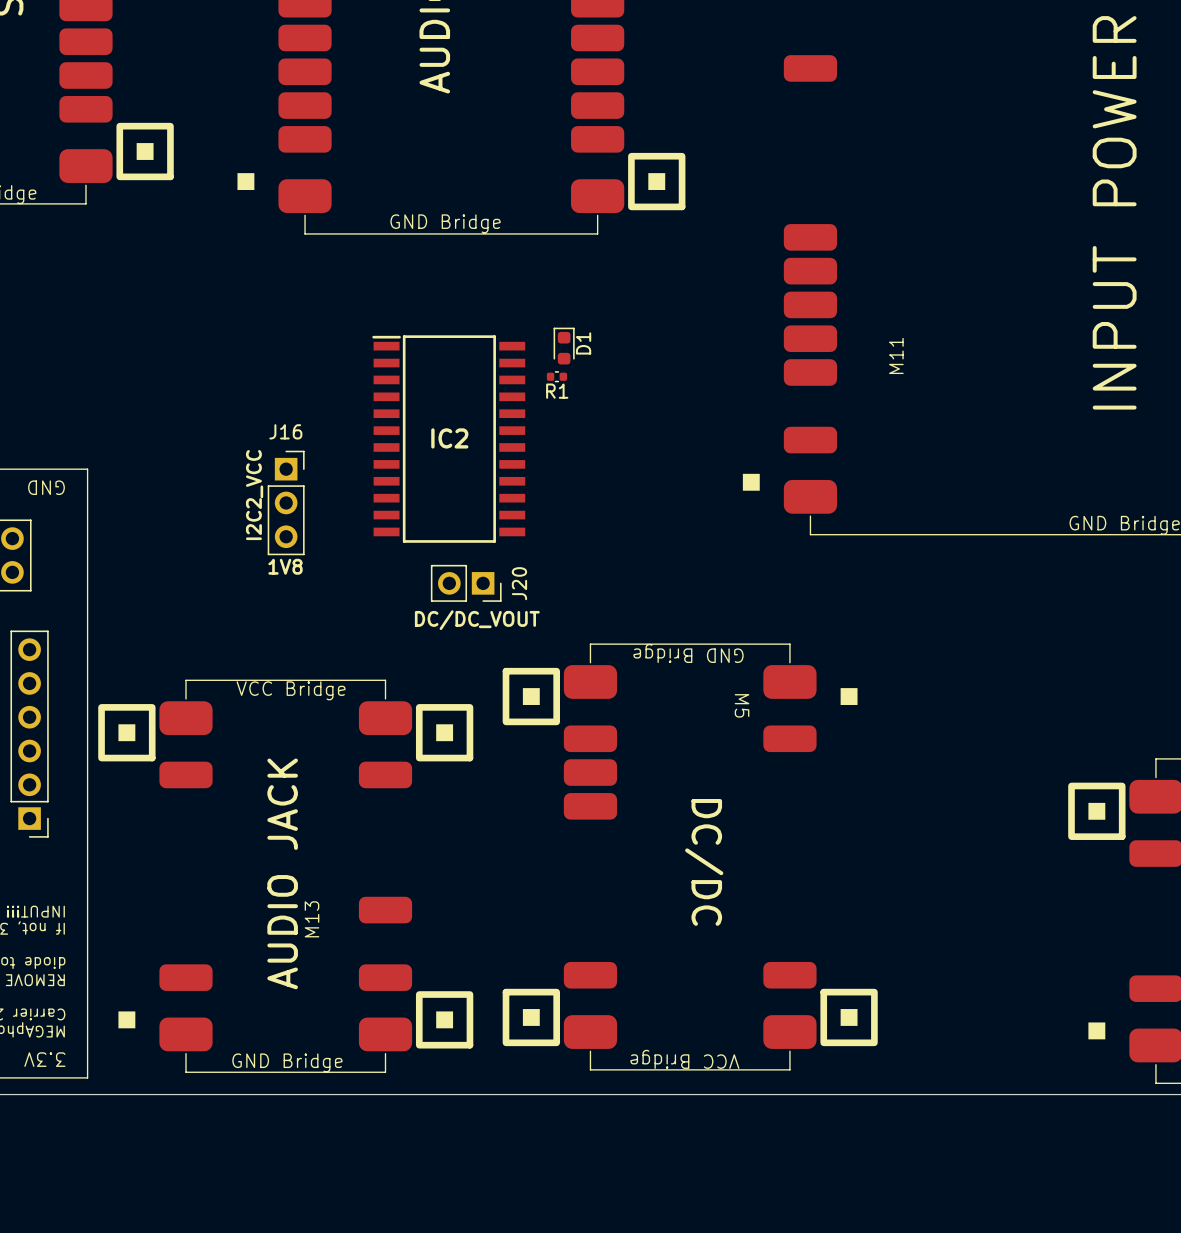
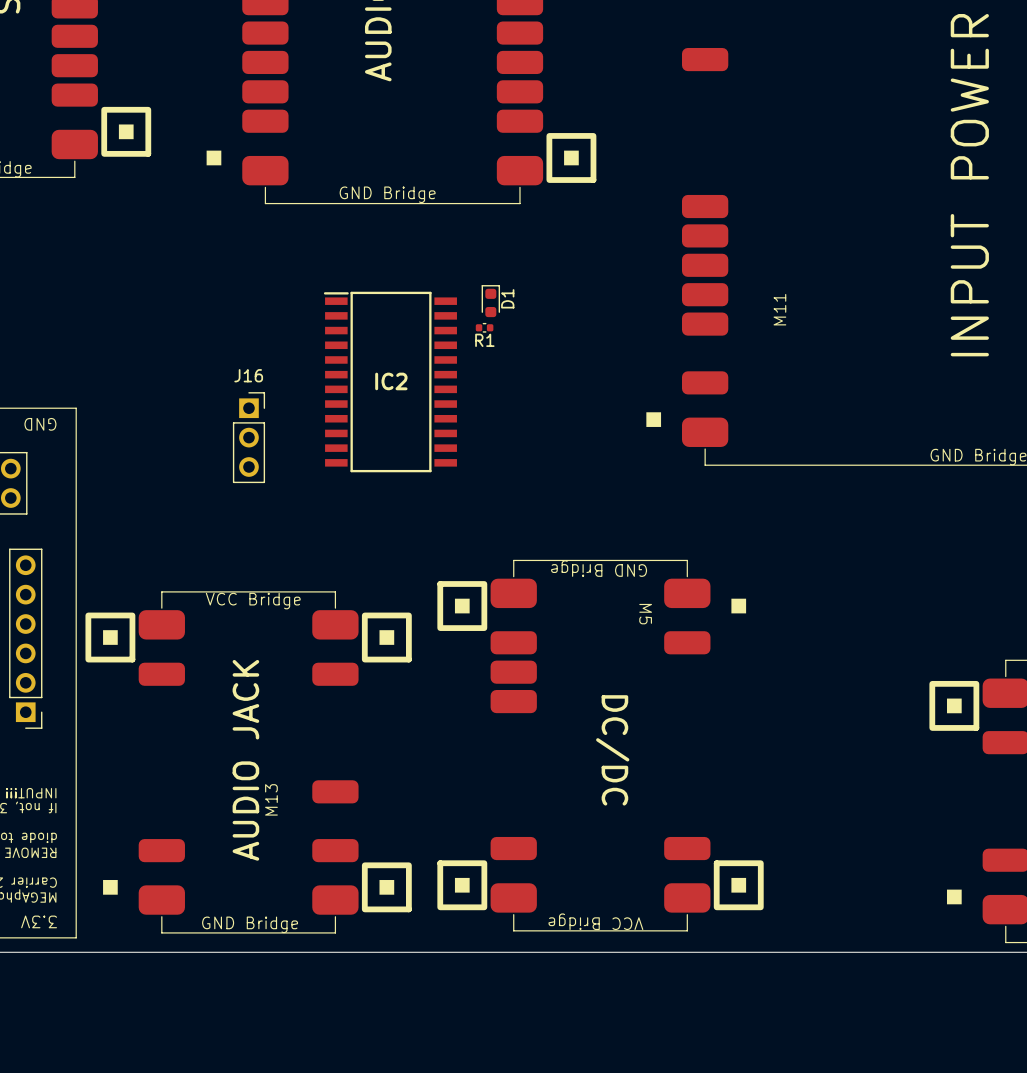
text: I2C2_VCC (254, 495) -> none
text: 1V8 (285, 566) -> none
J20: (466, 583) -> none
text: DC/DC_VOUT (477, 620) -> none

